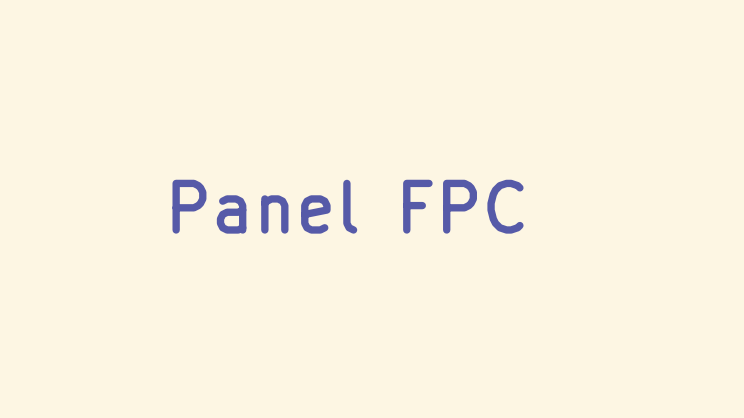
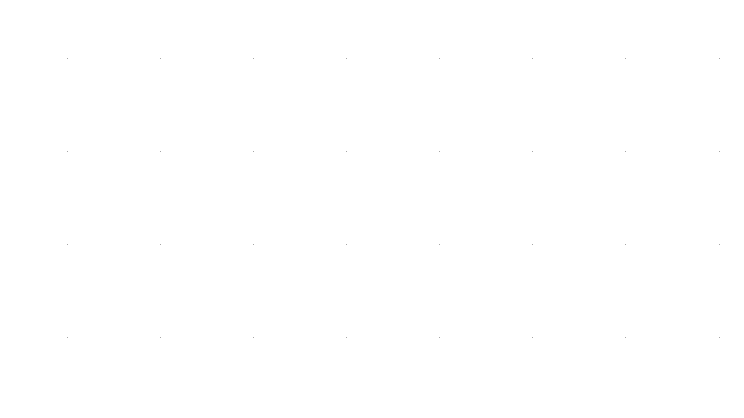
text: Panel FPC (348, 206) -> none

